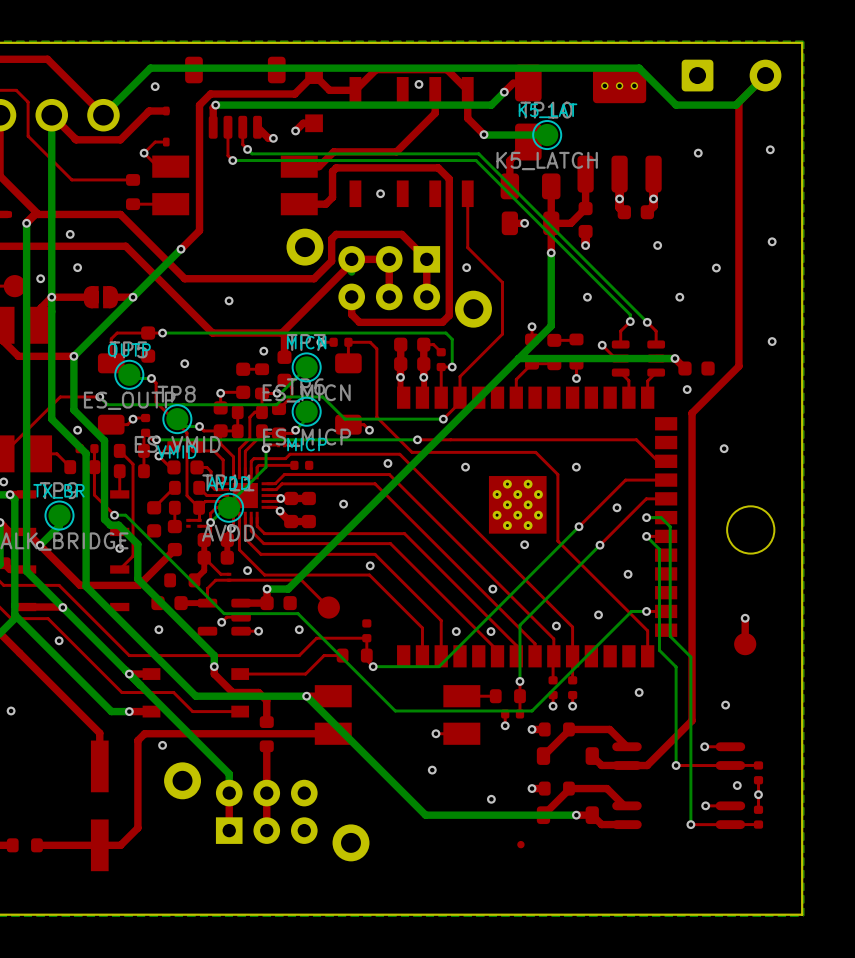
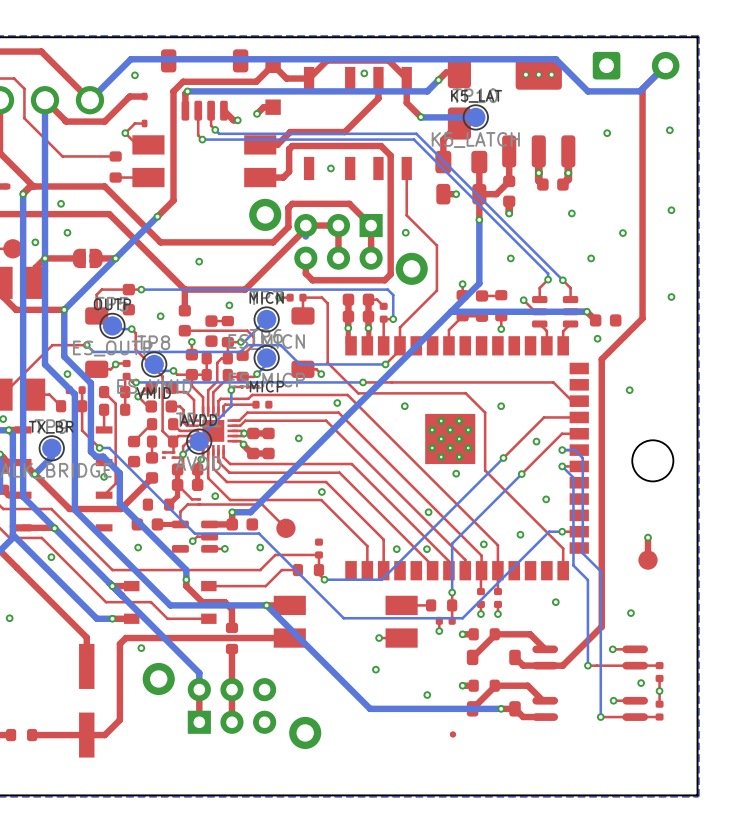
top track: none -> (184, 289) (184, 310)
top track: (281, 333) (284, 335) (284, 357) -> none
part position: (284, 368) -> (184, 320)
top track: none -> (247, 330) (184, 330)
top track: (243, 392) (221, 392) -> none

